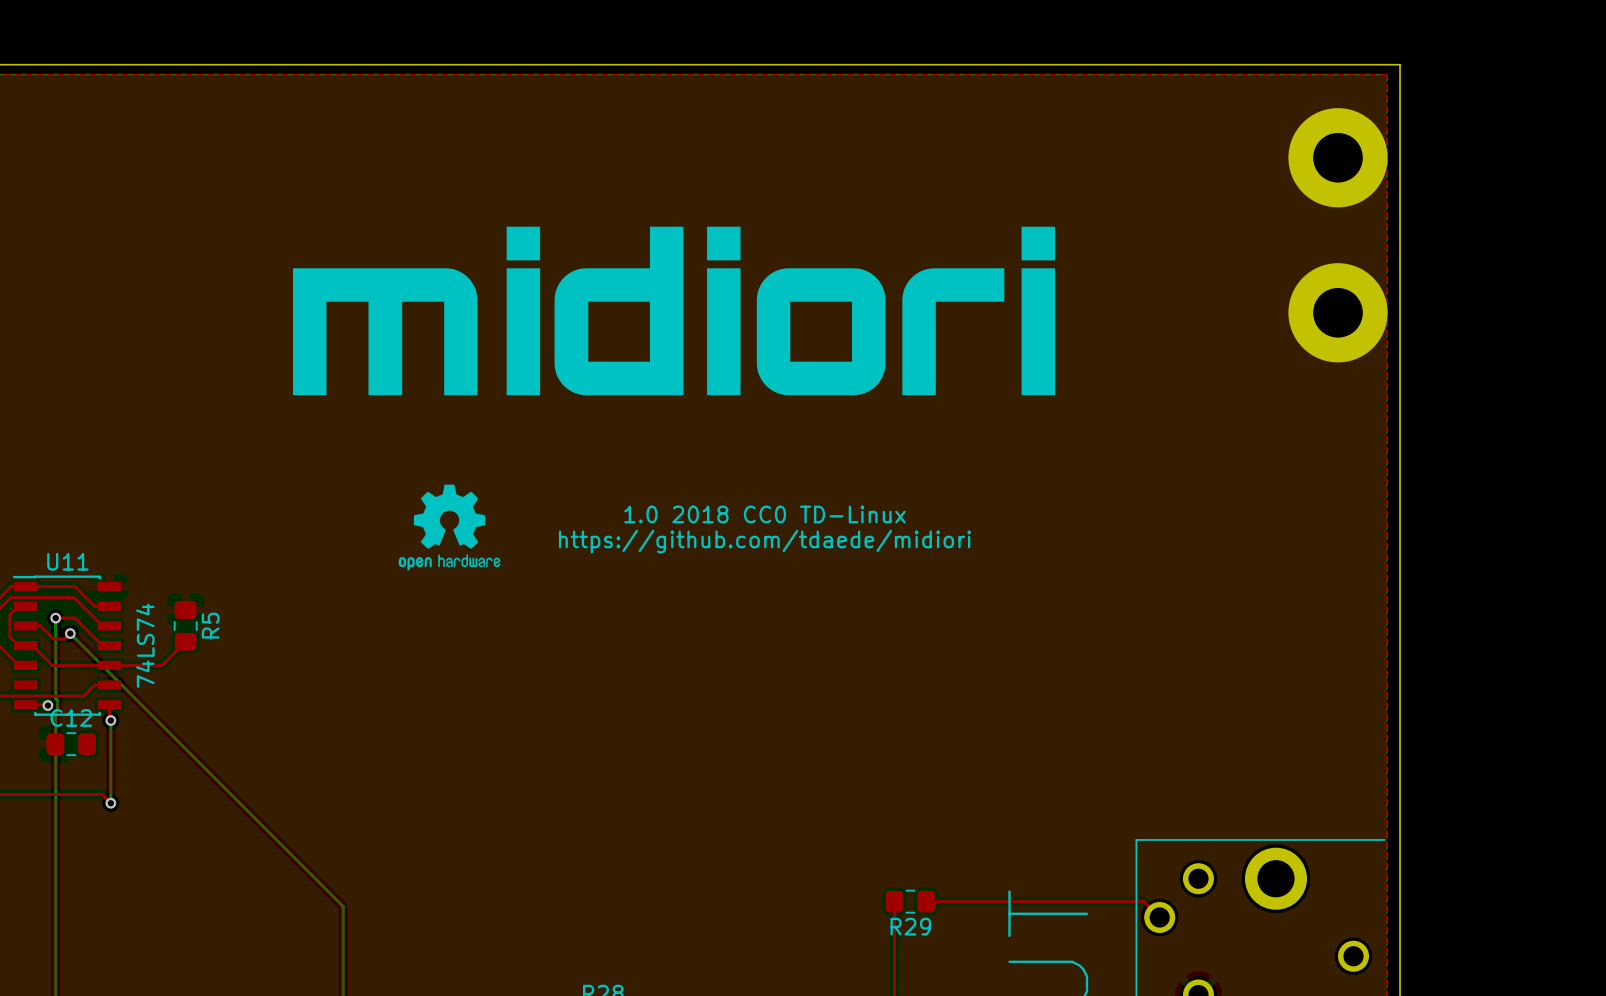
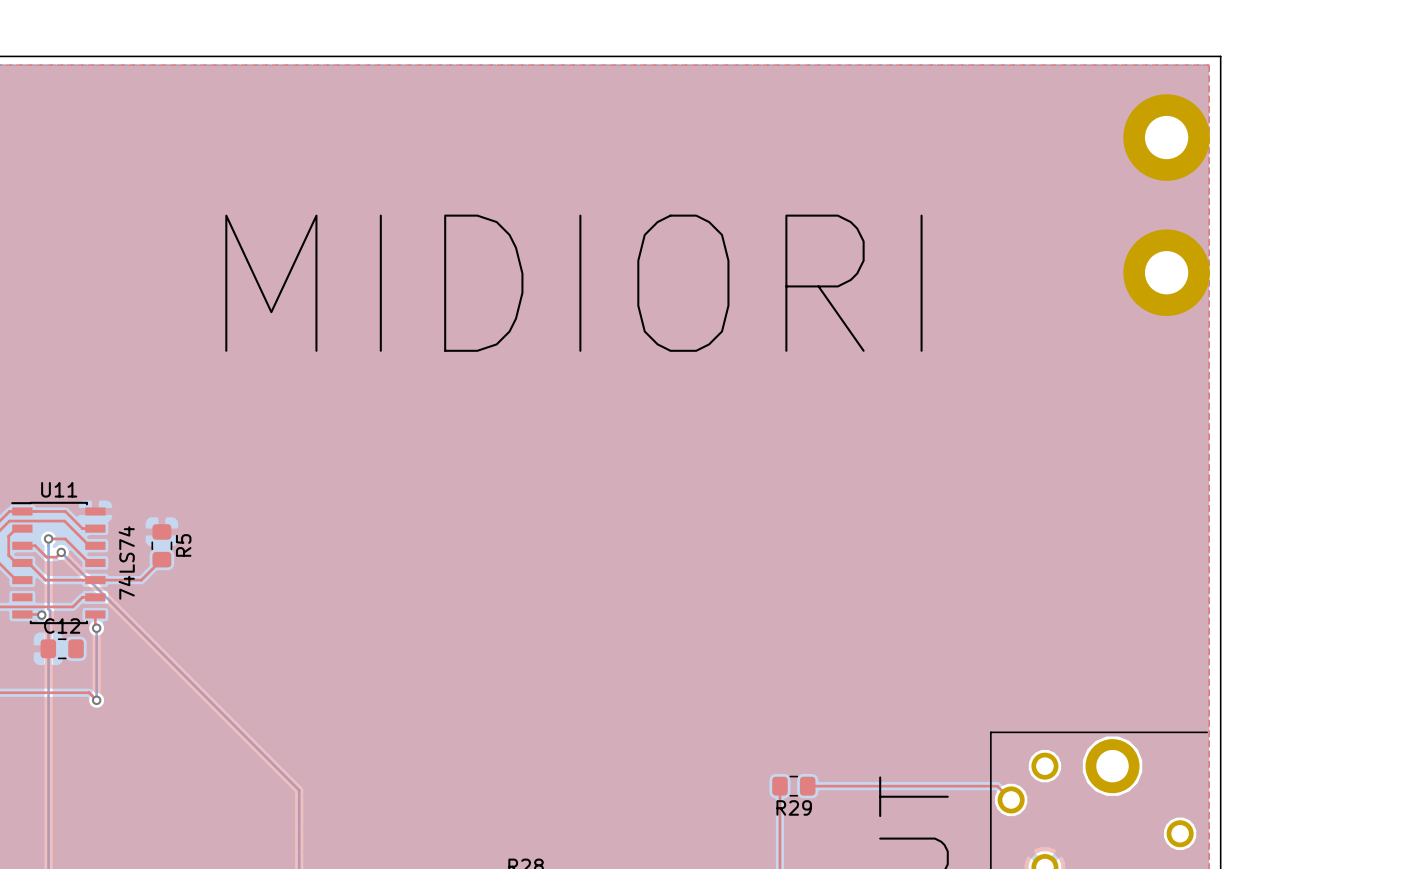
drawing: [292, 226, 1056, 396] -> none
text: none -> MIDIORI (573, 283)
drawing: [398, 484, 501, 571] -> none
text: 1.0 2018 CC0 TD-Linux (764, 514) -> none
text: https://github.com/tdaede/midiori (764, 541) -> none

